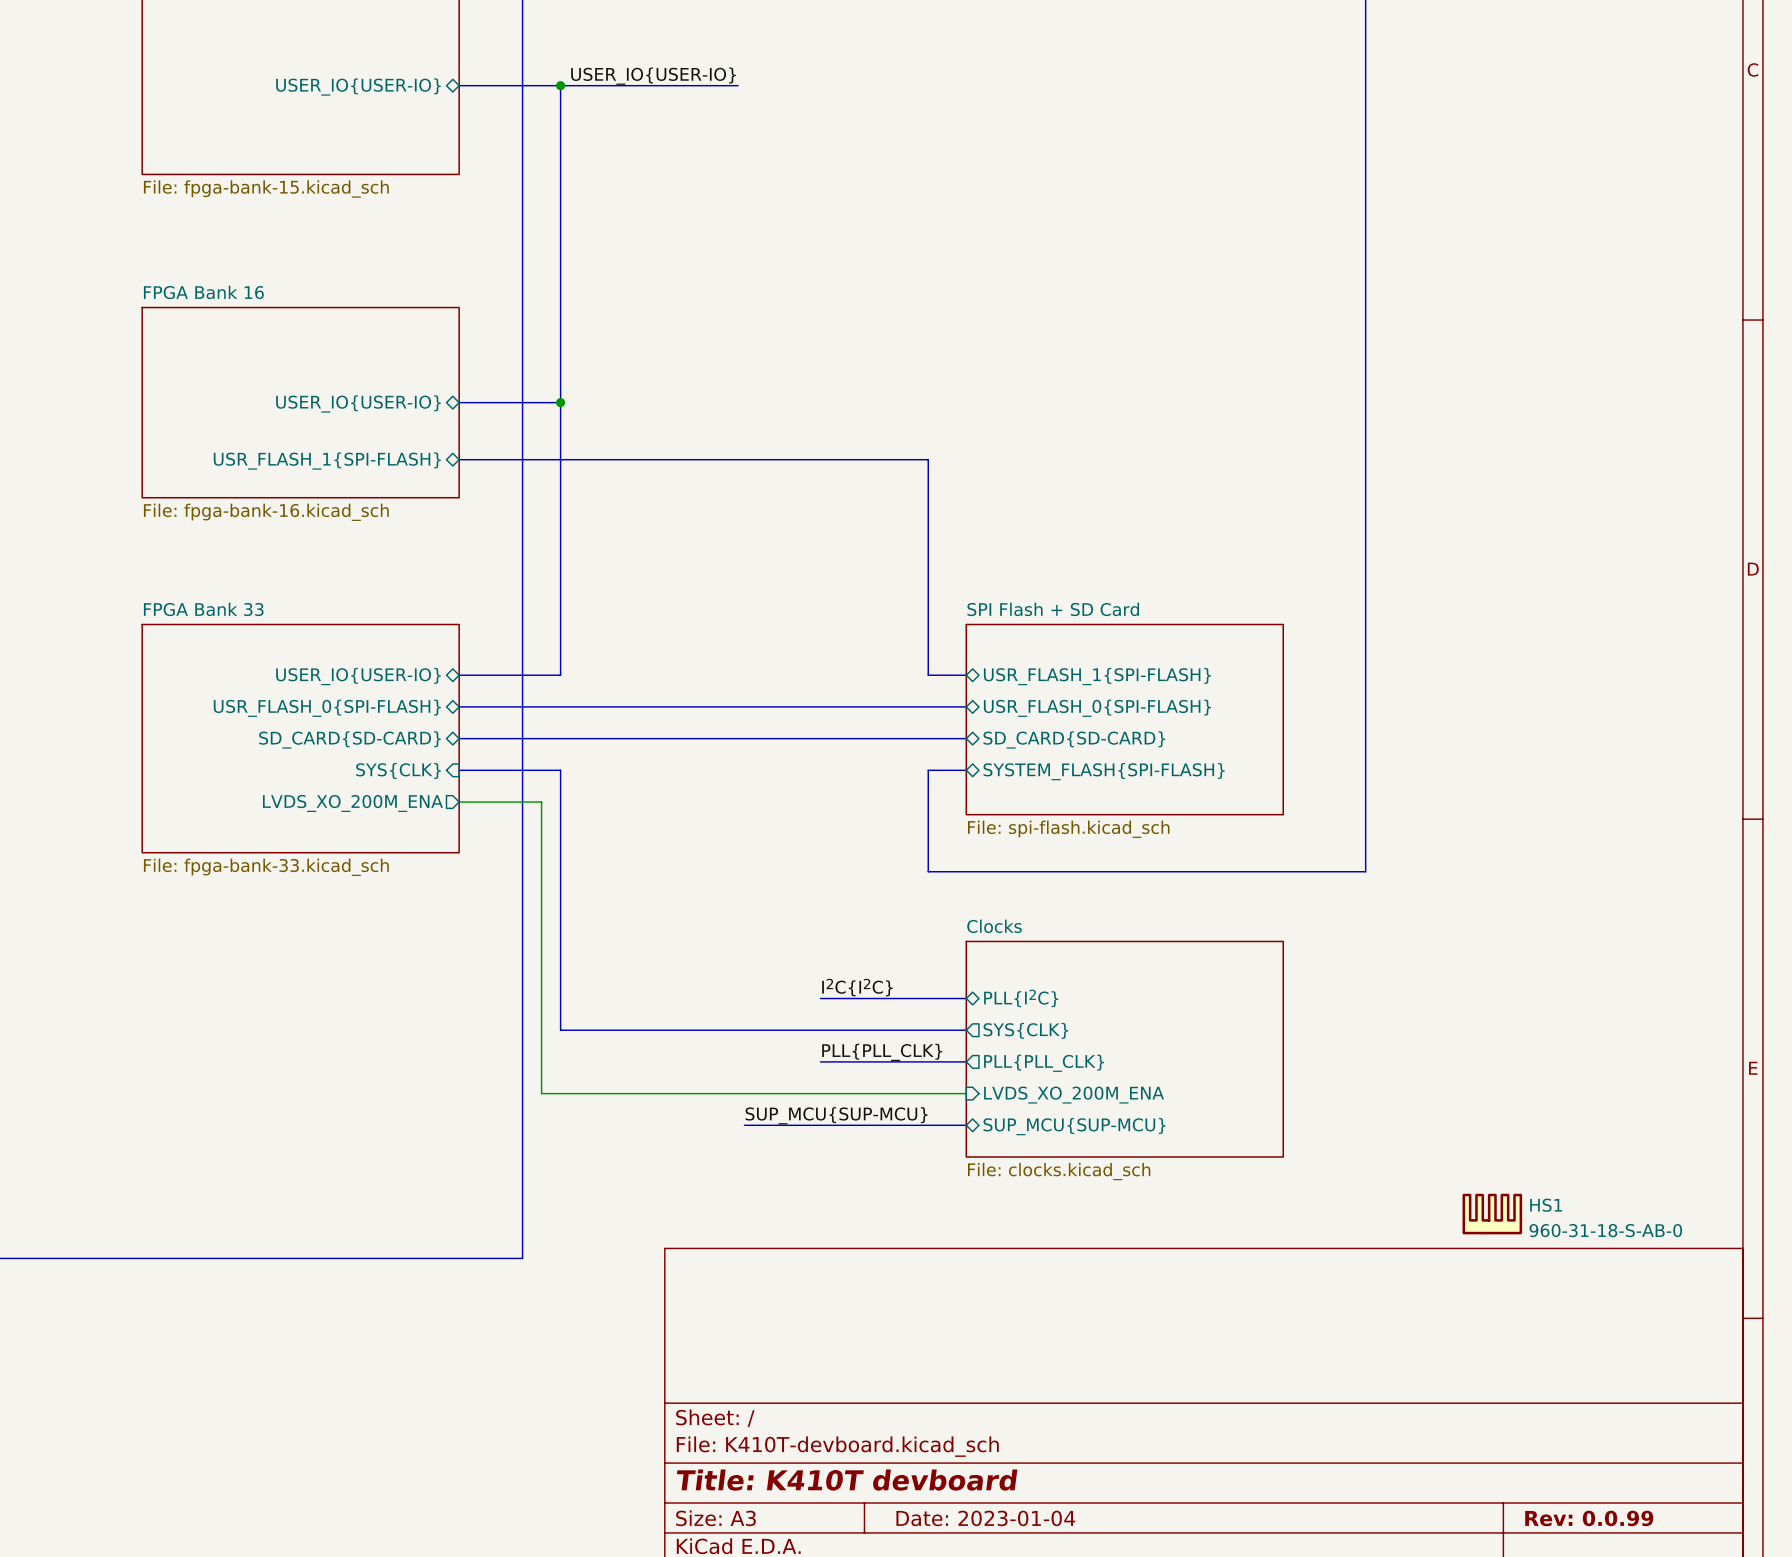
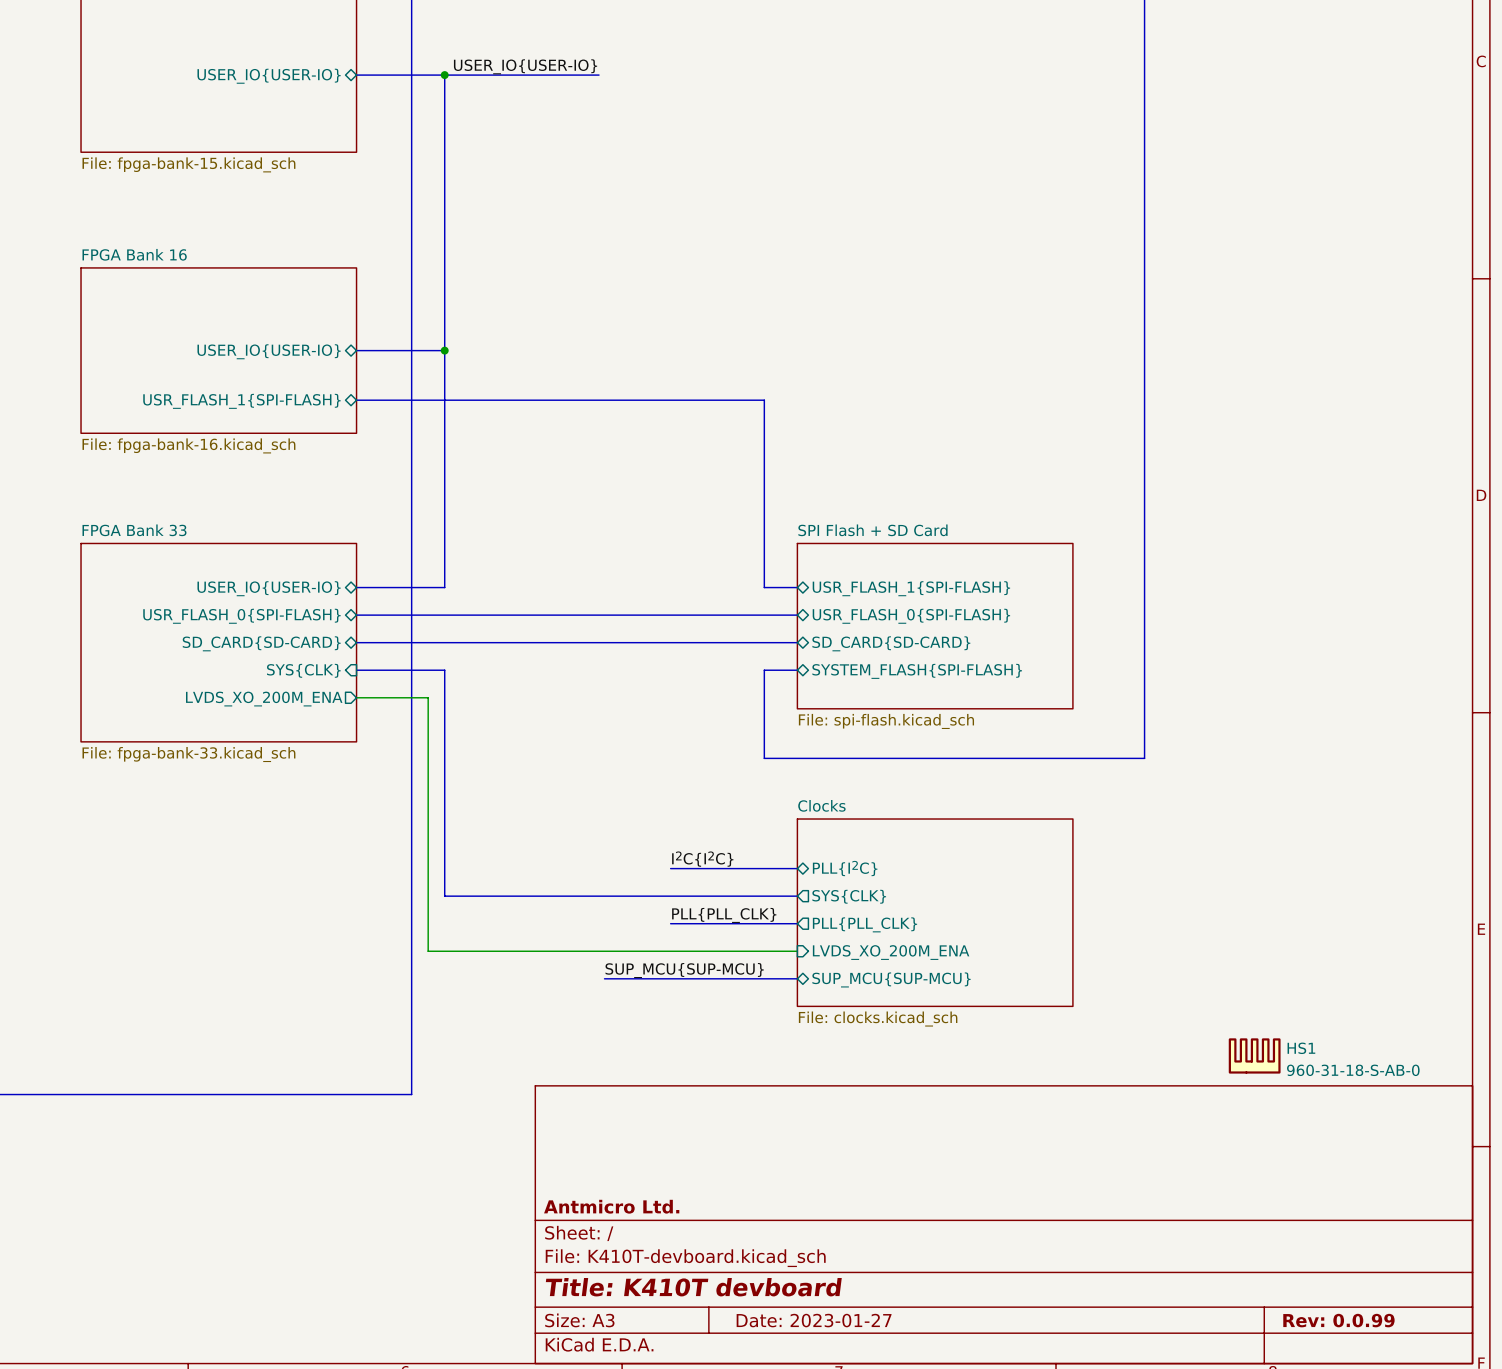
title block: none -> Antmicro Ltd. (611, 1206)
title block: Date: 2023-01-04 (985, 1518) -> Date: 2023-01-27 (814, 1320)

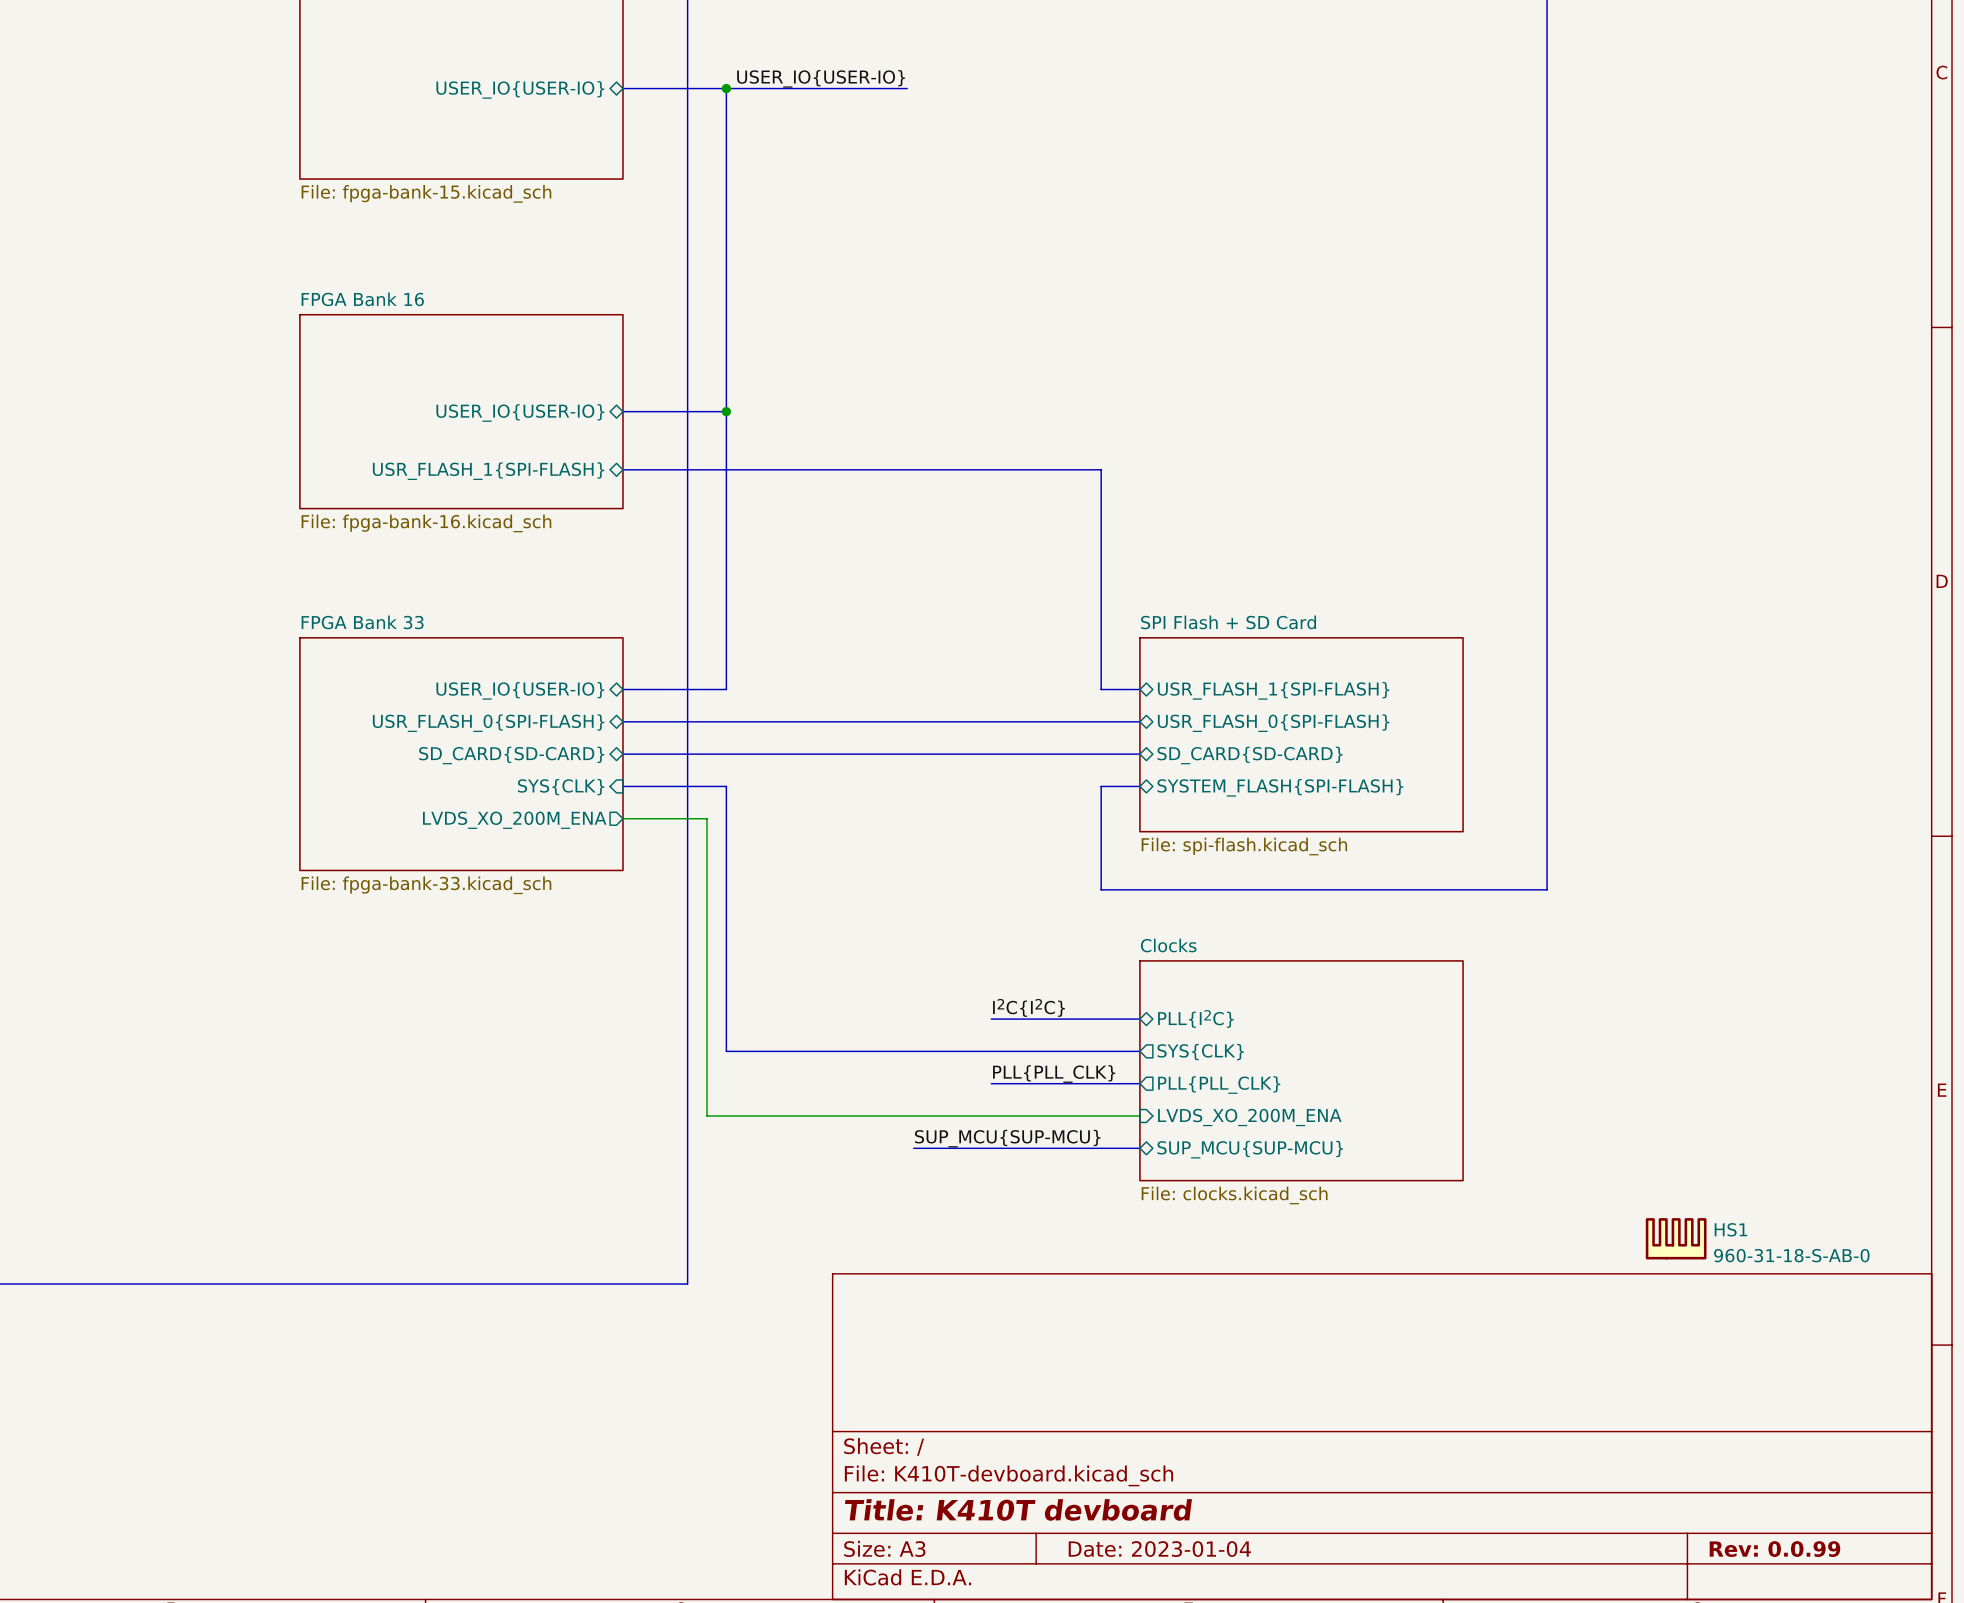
title block: Antmicro Ltd. (611, 1206) -> none
title block: Date: 2023-01-27 (814, 1320) -> Date: 2023-01-04 (1159, 1549)

